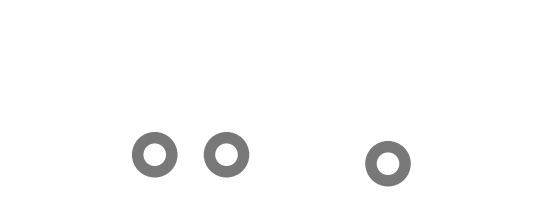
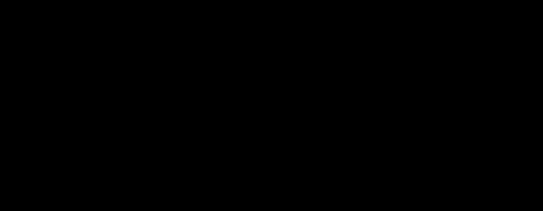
via: (154, 154) -> none
via: (226, 154) -> none
via: (388, 163) -> none

